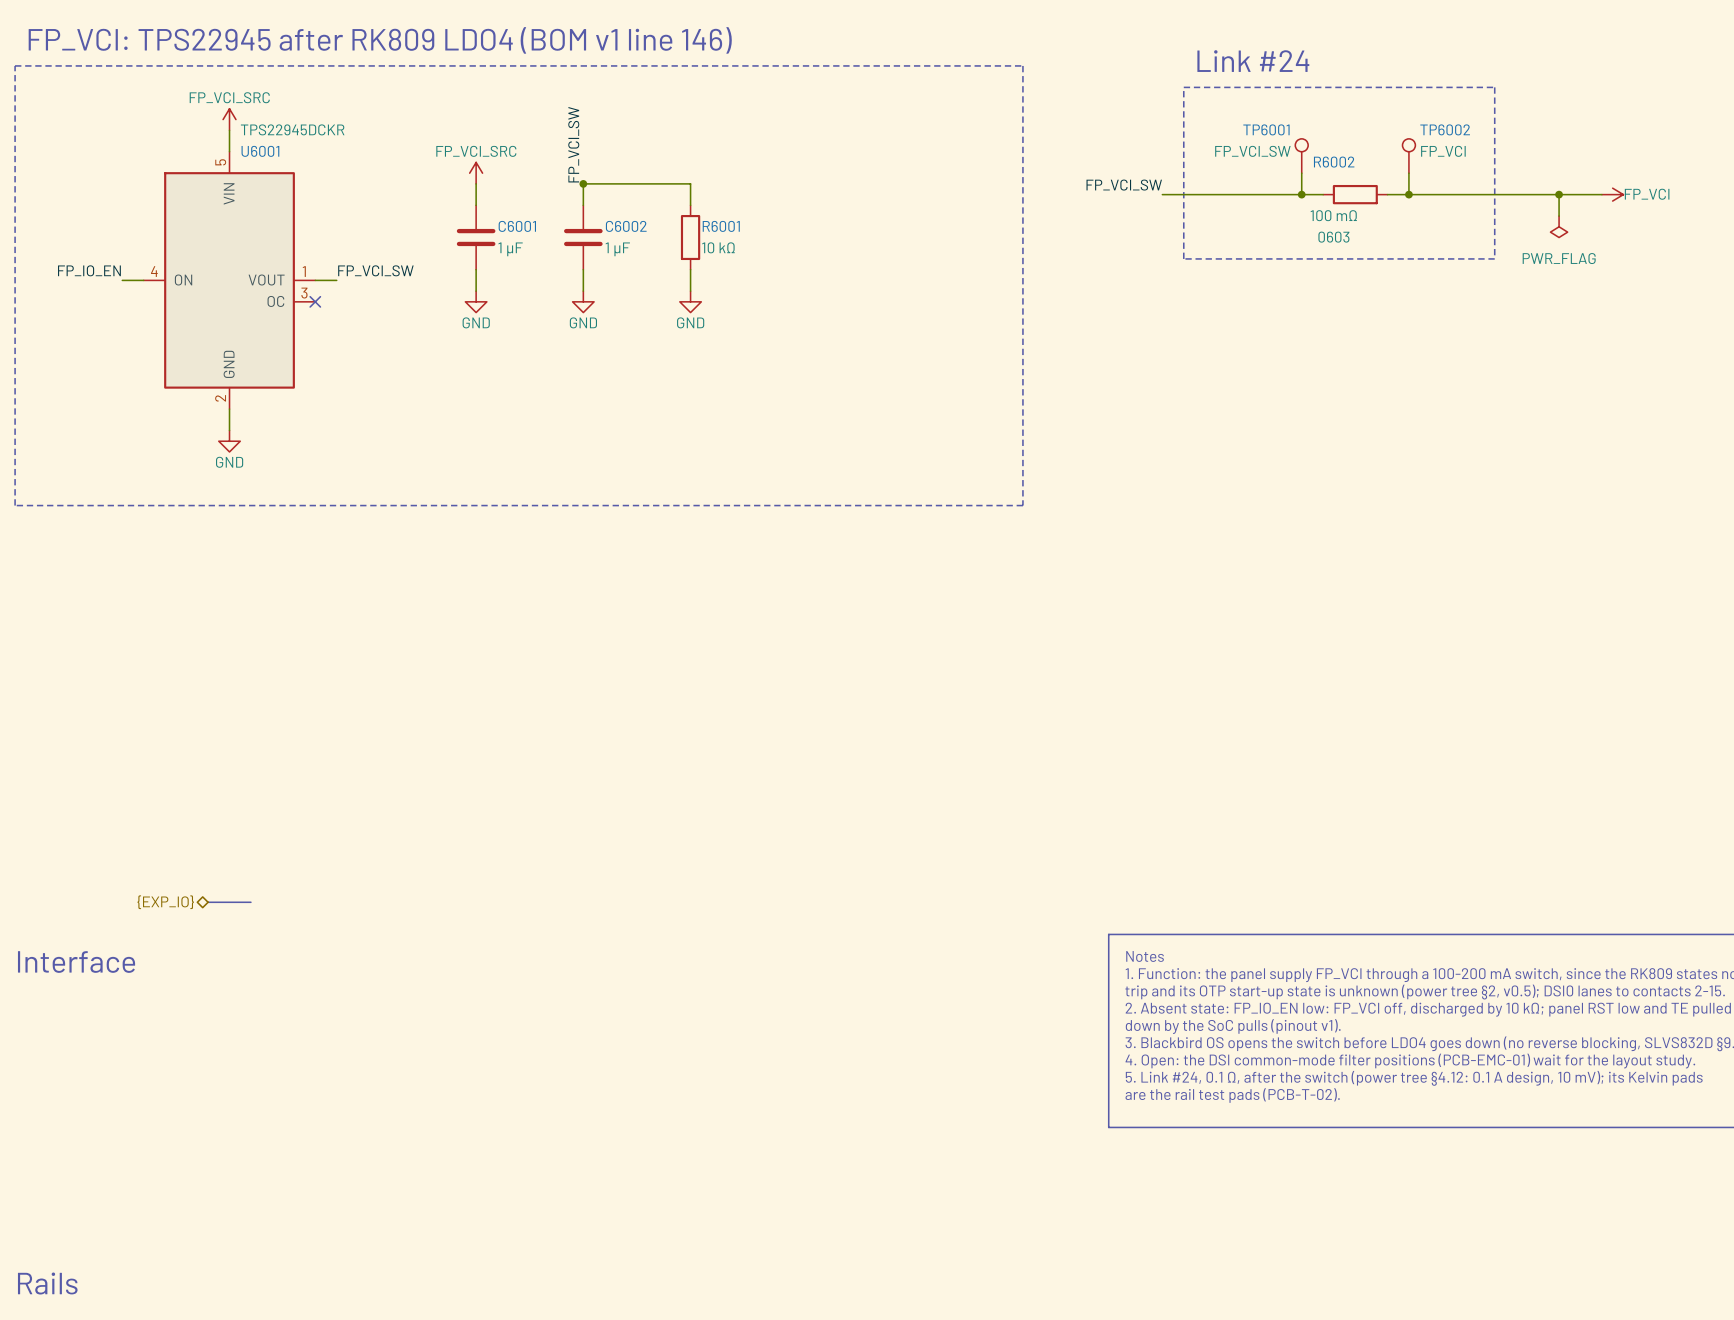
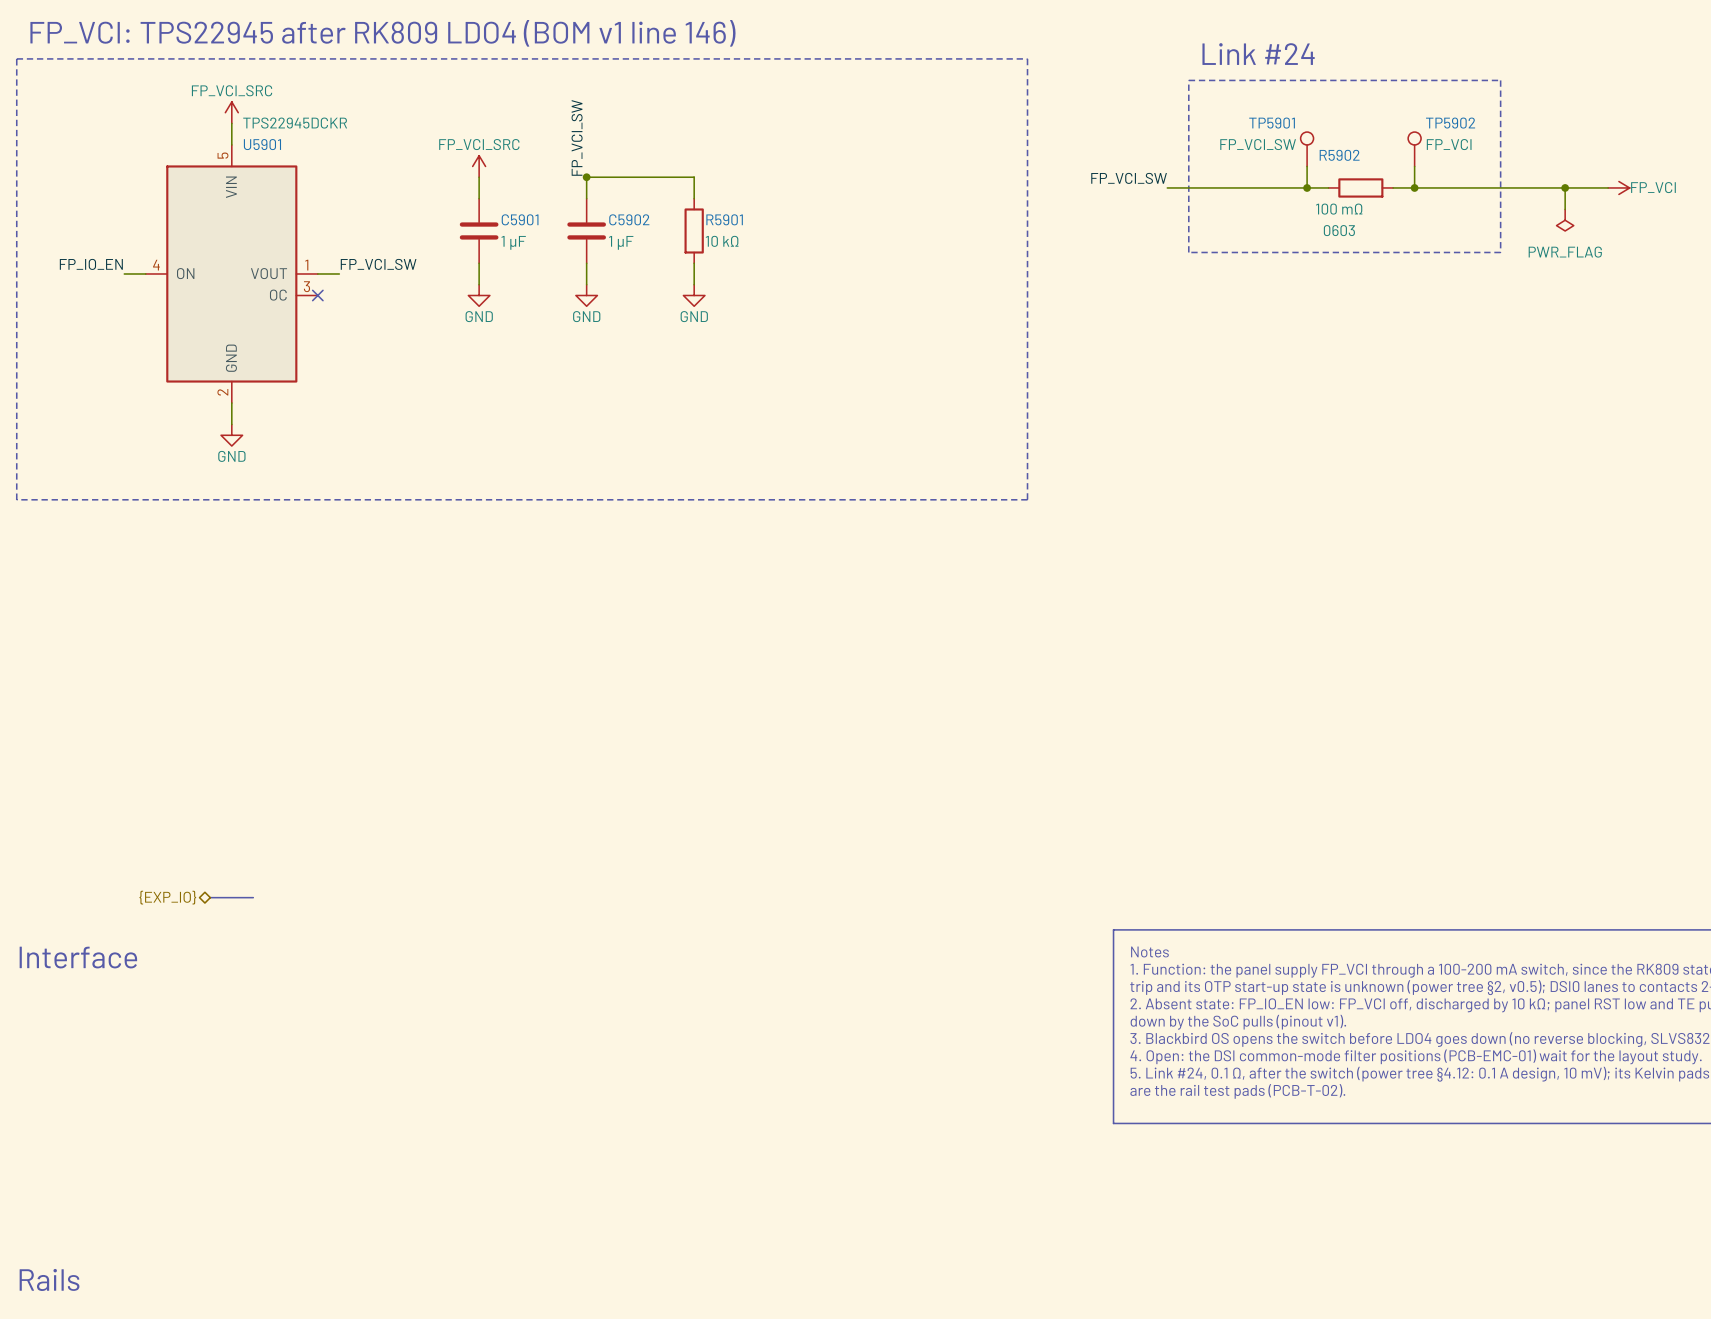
TP6001 name: TP6001 (1266, 129) -> TP5901 (1272, 123)
TP6002 name: TP6002 (1445, 129) -> TP5902 (1450, 123)
U6001 name: U6001 (260, 151) -> U5901 (262, 144)
R6002 name: R6002 (1334, 162) -> R5902 (1339, 155)
C6001 name: C6001 (517, 226) -> C5901 (520, 219)
C6002 name: C6002 (626, 226) -> C5902 (629, 219)
R6001 name: R6001 (721, 226) -> R5901 (724, 219)

